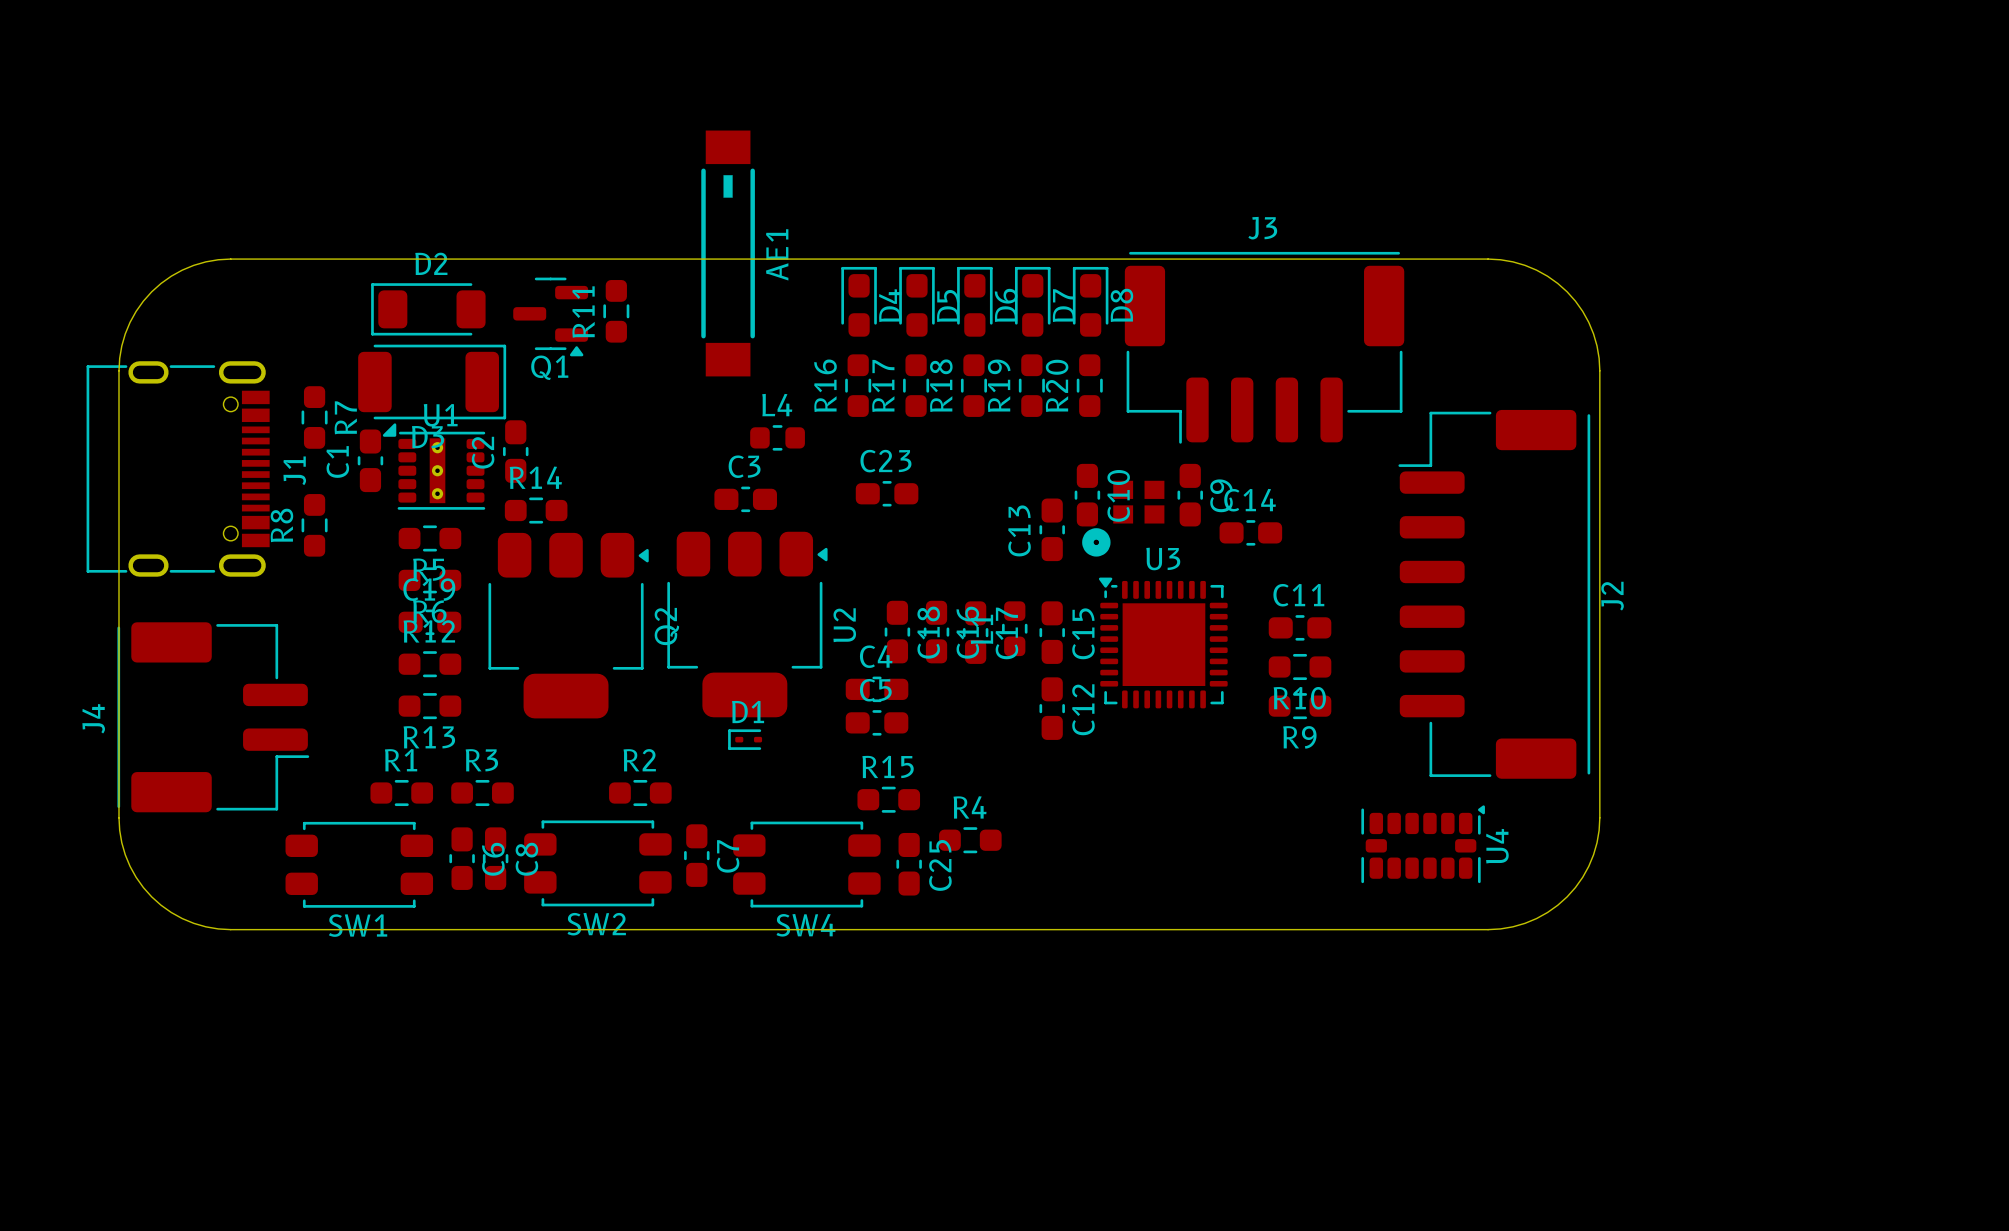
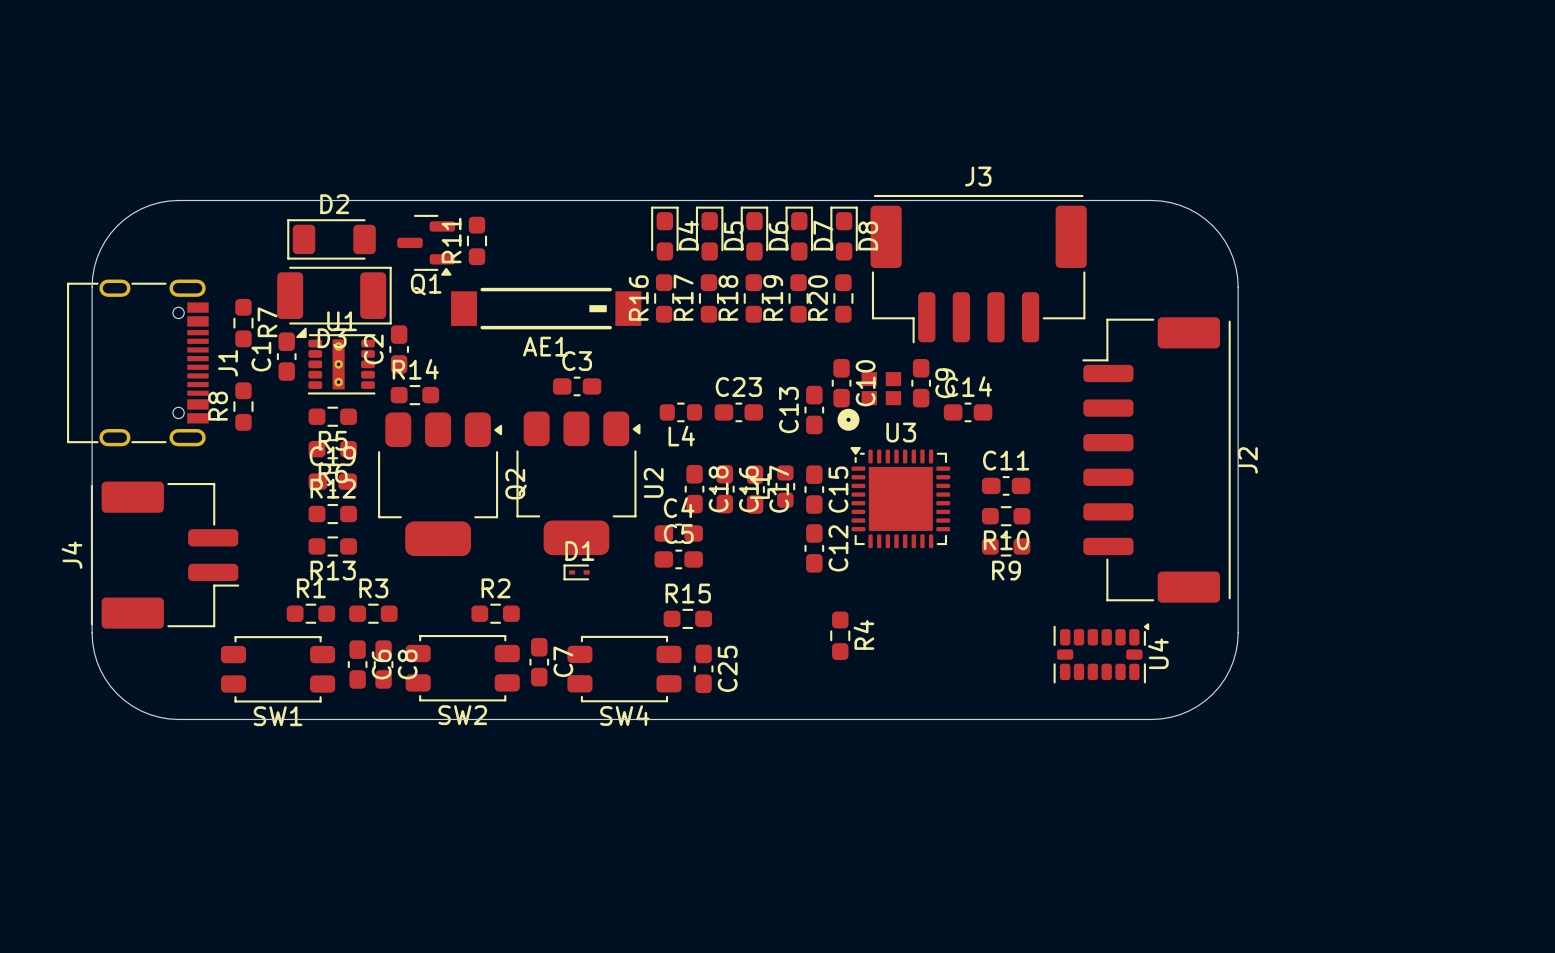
AE1 rotation: 0° (728, 253) -> 90° clockwise (546, 308)
L4 name position: L4 (777, 405) -> L4 (681, 436)
L4 position: (777, 437) -> (680, 412)
C23 position: (887, 493) -> (738, 412)
R4 rotation: 0° (970, 840) -> 90° clockwise (840, 635)
R4 position: (970, 840) -> (840, 635)

